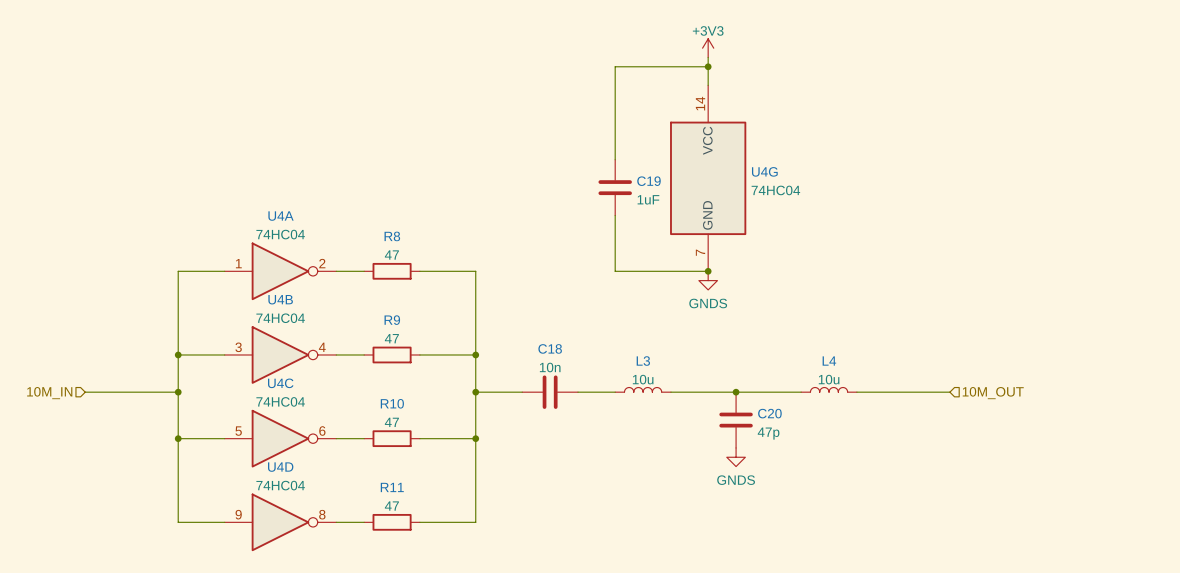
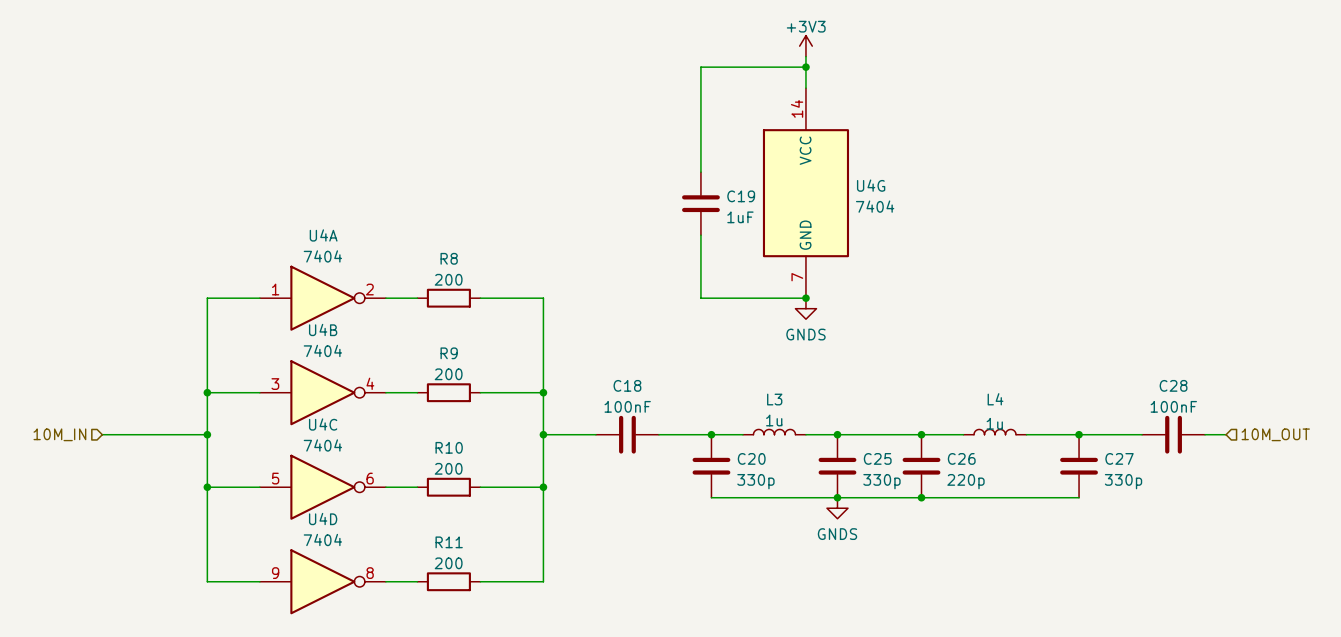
U4G value: 74HC04 (775, 190) -> 7404 (875, 206)
U4A value: 74HC04 (280, 234) -> 7404 (322, 256)
R8 value: 47 (391, 255) -> 200 (448, 279)
U4B value: 74HC04 (280, 318) -> 7404 (322, 350)
R9 value: 47 (391, 338) -> 200 (448, 374)
C18 value: 10n (550, 367) -> 100nF (627, 406)
L3 value: 10u (643, 379) -> 1u (774, 420)
L4 value: 10u (829, 379) -> 1u (994, 423)
L3 position: (643, 389) -> (774, 432)
L4 position: (829, 389) -> (995, 432)
junction: none -> (711, 434)
wire: (670, 392) (708, 392) -> (700, 434) (742, 434)
junction: none -> (921, 434)
wire: (856, 392) (903, 392) -> (911, 434) (963, 434)
wire: none -> (1079, 434) (1142, 434)
junction: none -> (1079, 434)
C28: none -> 100nF (1173, 434)
wire: none -> (1205, 434) (1226, 434)
hierarchical label position: 10M_OUT (993, 393) -> 10M_OUT (1275, 434)
U4C value: 74HC04 (280, 401) -> 7404 (322, 445)
C20 name: C20 (769, 413) -> C25 (877, 458)
C20: none -> 330p (711, 466)
C26: none -> 220p (921, 466)
C27: none -> 330p (1079, 466)
R10 value: 47 (391, 422) -> 200 (448, 468)
C20 value: 47p (768, 433) -> 330p (881, 481)
wire: none -> (711, 497) (1079, 497)
junction: none -> (837, 497)
junction: none -> (921, 497)
U4D value: 74HC04 (280, 485) -> 7404 (322, 539)
R11 value: 47 (391, 506) -> 200 (448, 563)

